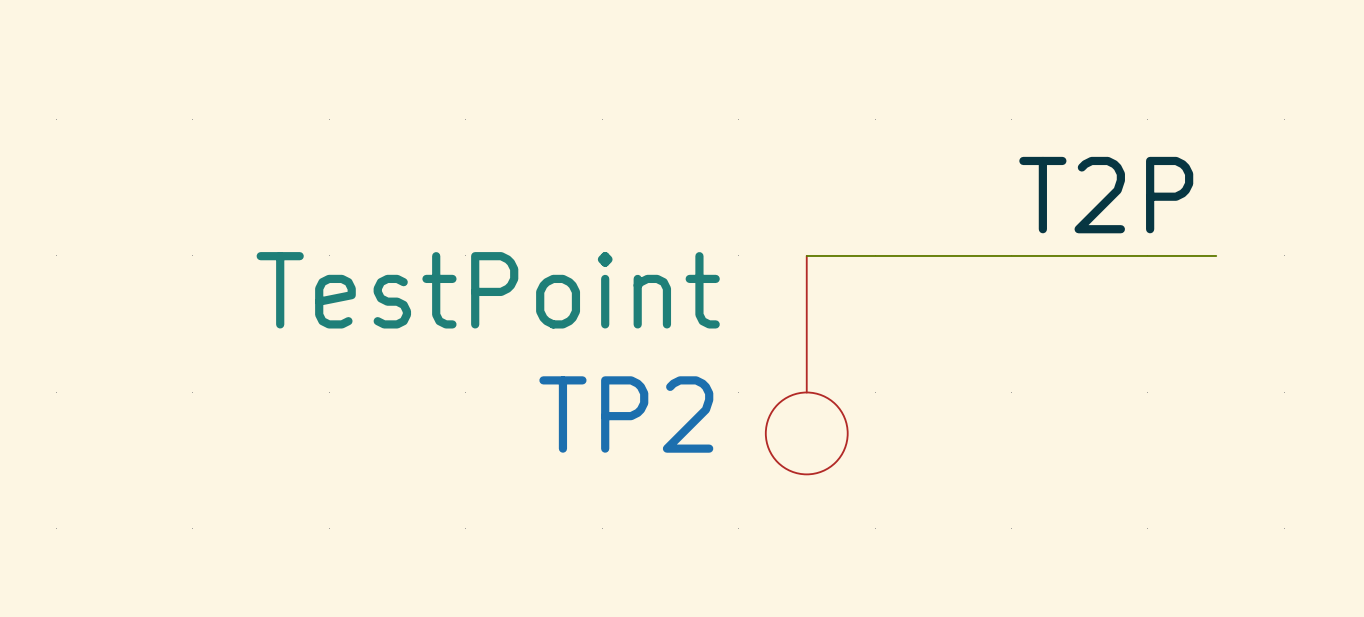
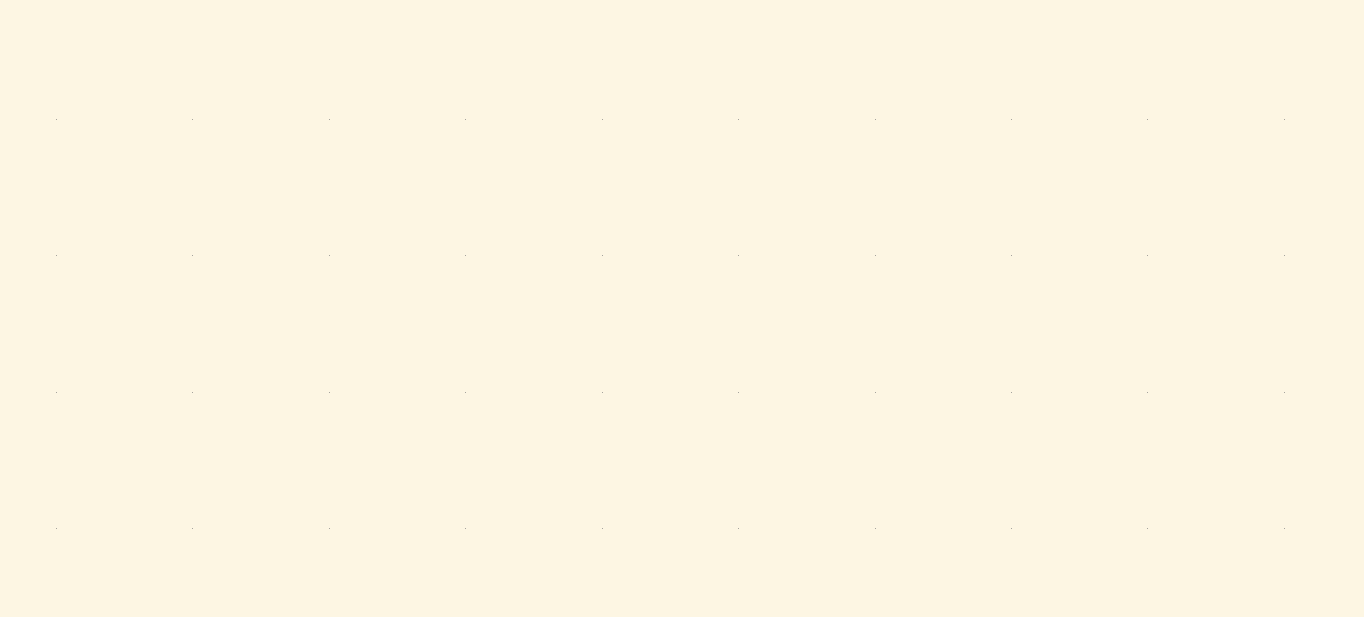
label: T2P (1106, 195) -> none
wire: (806, 255) (1216, 255) -> none
TP2: TestPoint (806, 365) -> none

